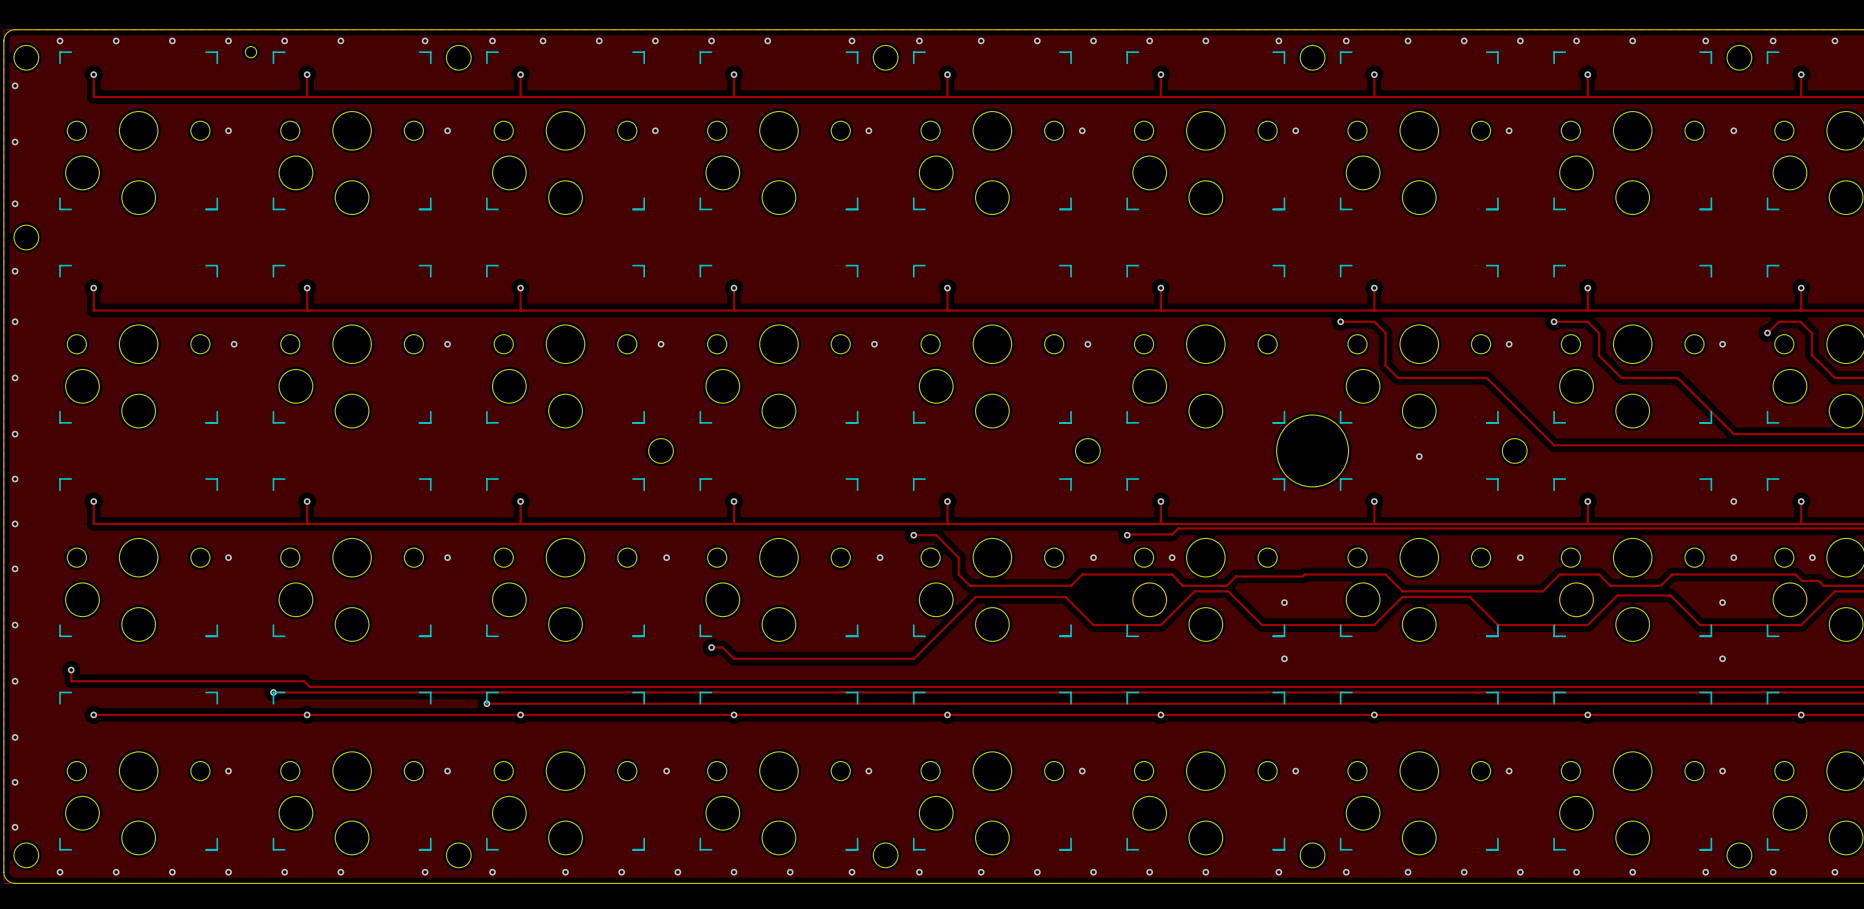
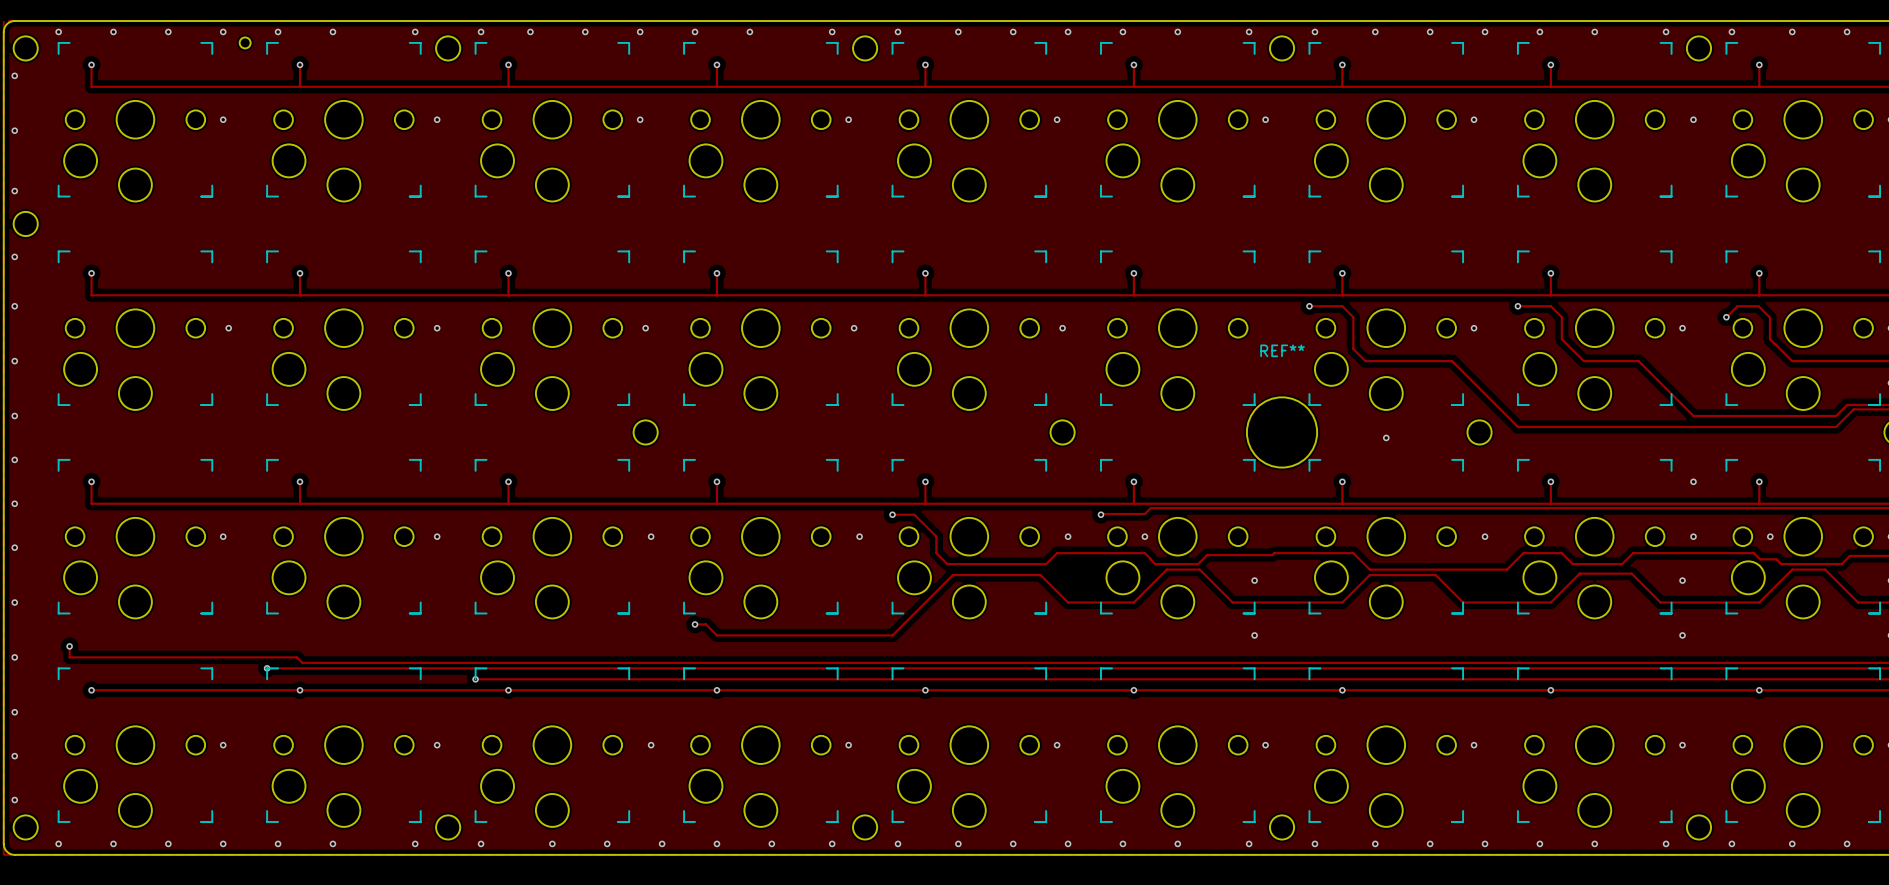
REF** name: none -> REF** (1282, 350)

